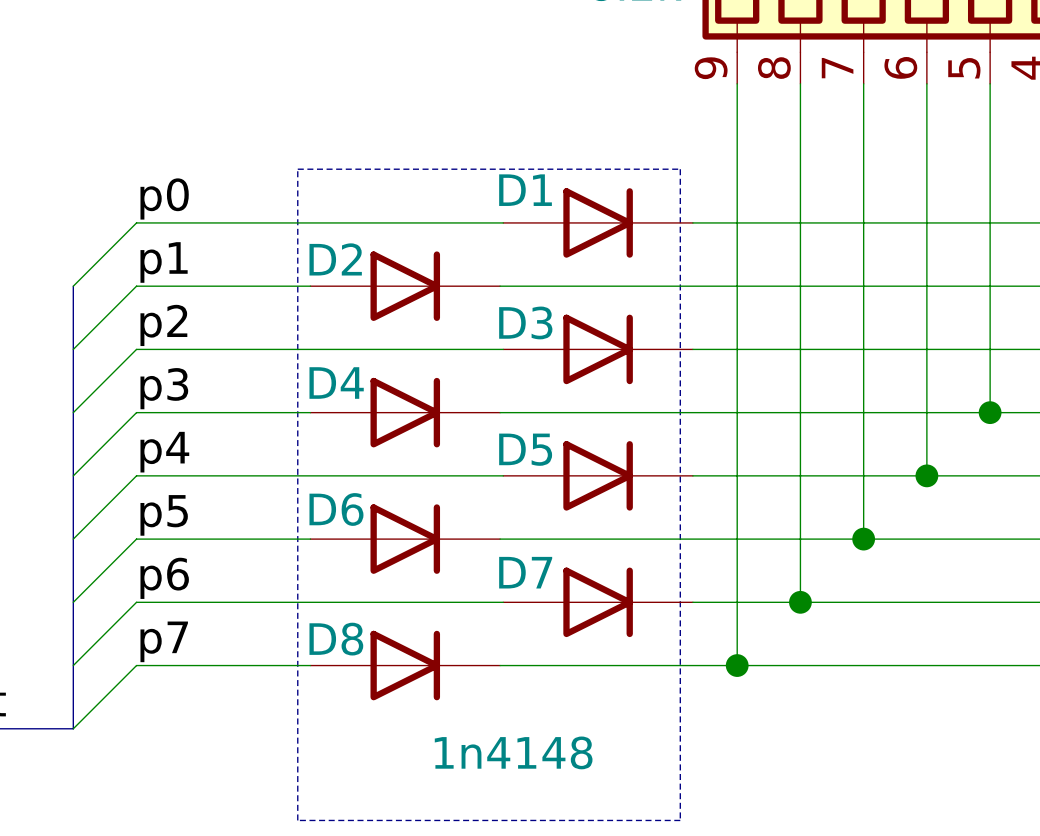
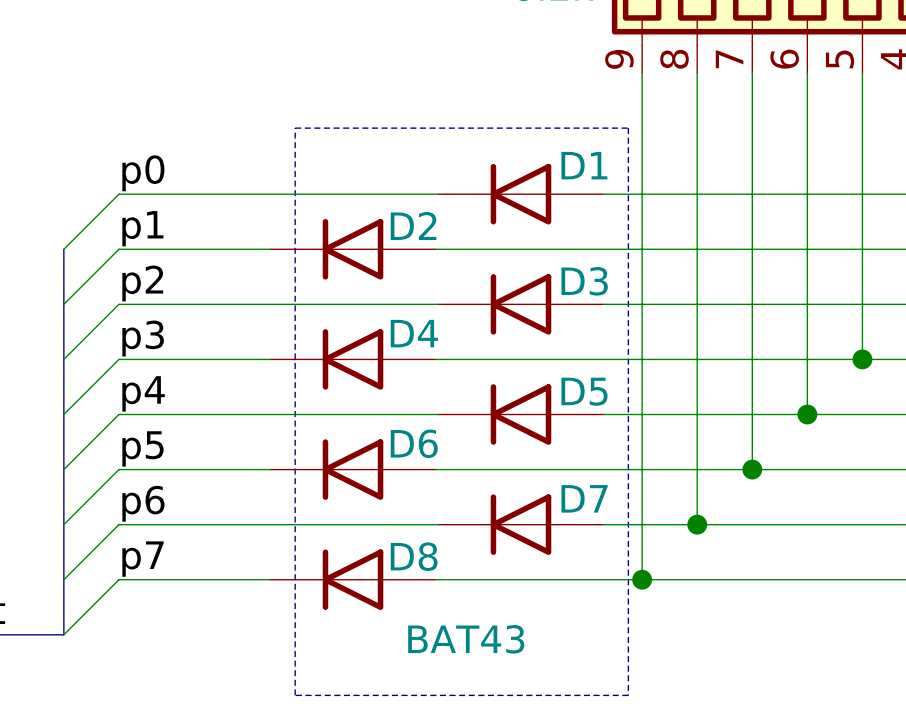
line: (297, 169) (297, 820) (680, 820) (680, 169) (297, 169) -> (295, 128) (295, 695) (628, 695) (628, 128) (295, 128)
D1 name position: D1 (525, 190) -> D1 (584, 165)
D1 rotation: 0° (598, 222) -> 180° (520, 194)
D2 rotation: 0° (405, 286) -> 180° (353, 249)
D3 rotation: 0° (598, 349) -> 180° (520, 304)
D4 name position: D4 (336, 383) -> D4 (414, 333)
D4 rotation: 0° (405, 412) -> 180° (353, 359)
D5 rotation: 0° (598, 475) -> 180° (520, 414)
D6 name position: D6 (336, 509) -> D6 (414, 443)
D6 rotation: 0° (405, 539) -> 180° (353, 469)
D7 name position: D7 (525, 572) -> D7 (584, 498)
D7 rotation: 0° (598, 602) -> 180° (520, 524)
D8 rotation: 0° (405, 665) -> 180° (353, 579)
D8 value: 1n4148 (513, 752) -> BAT43 (466, 639)

